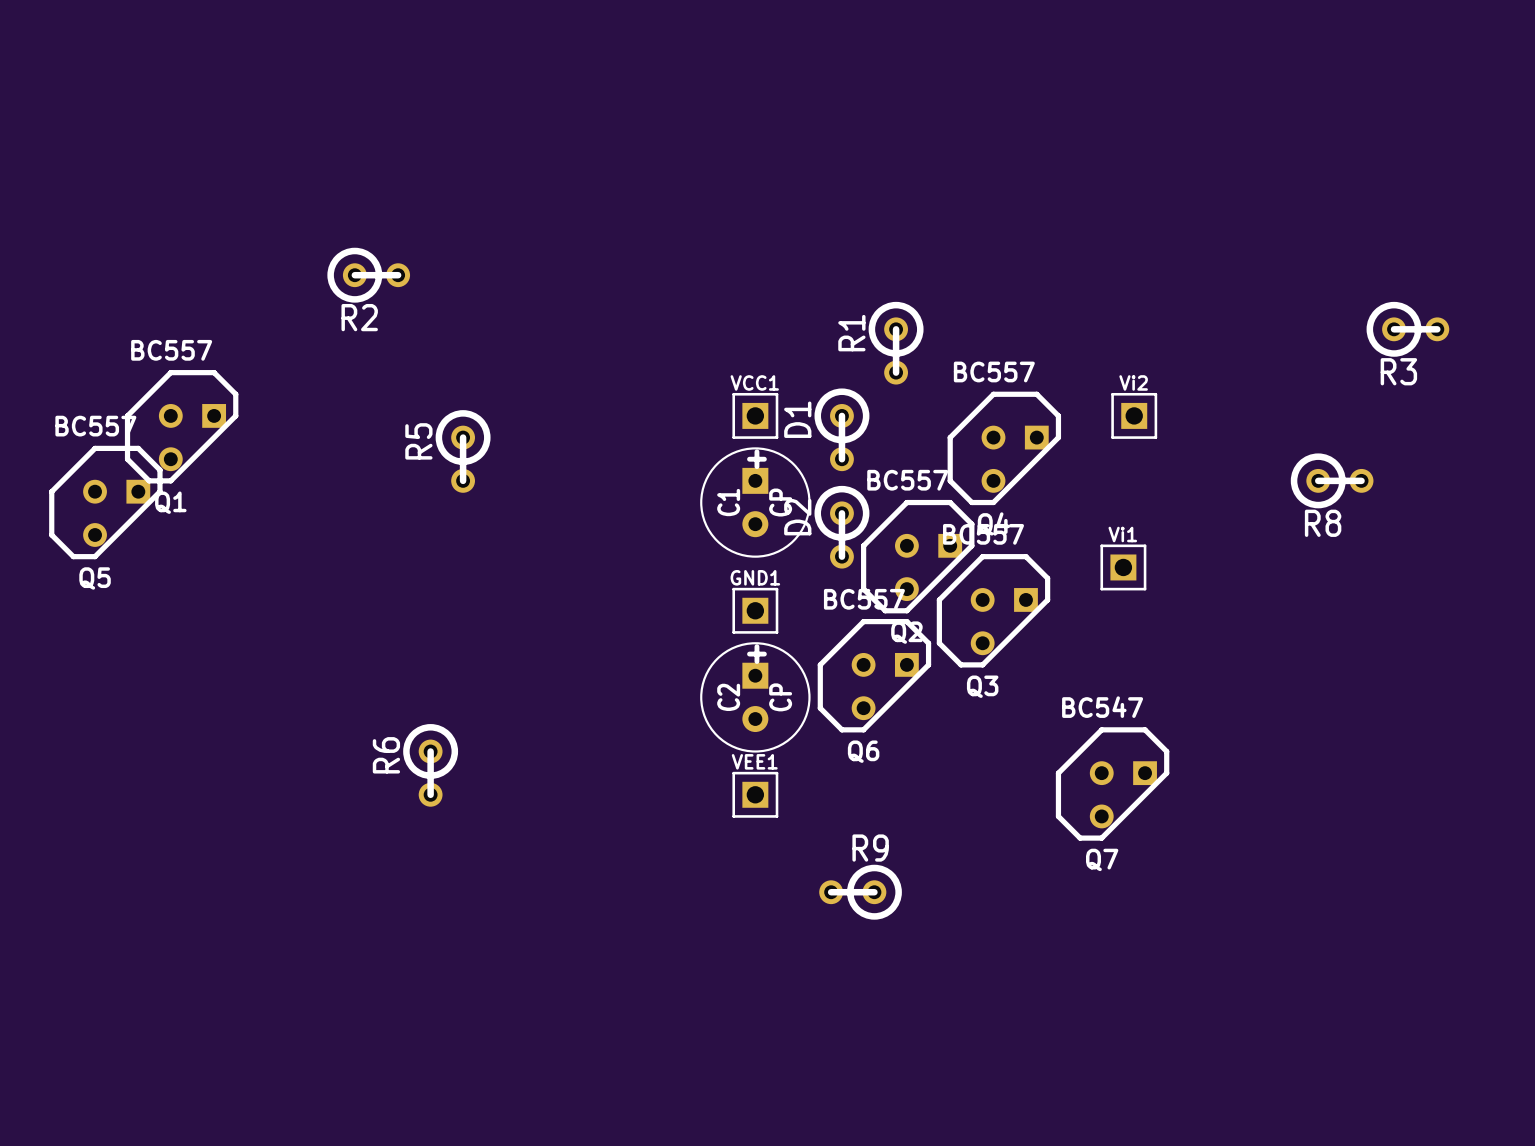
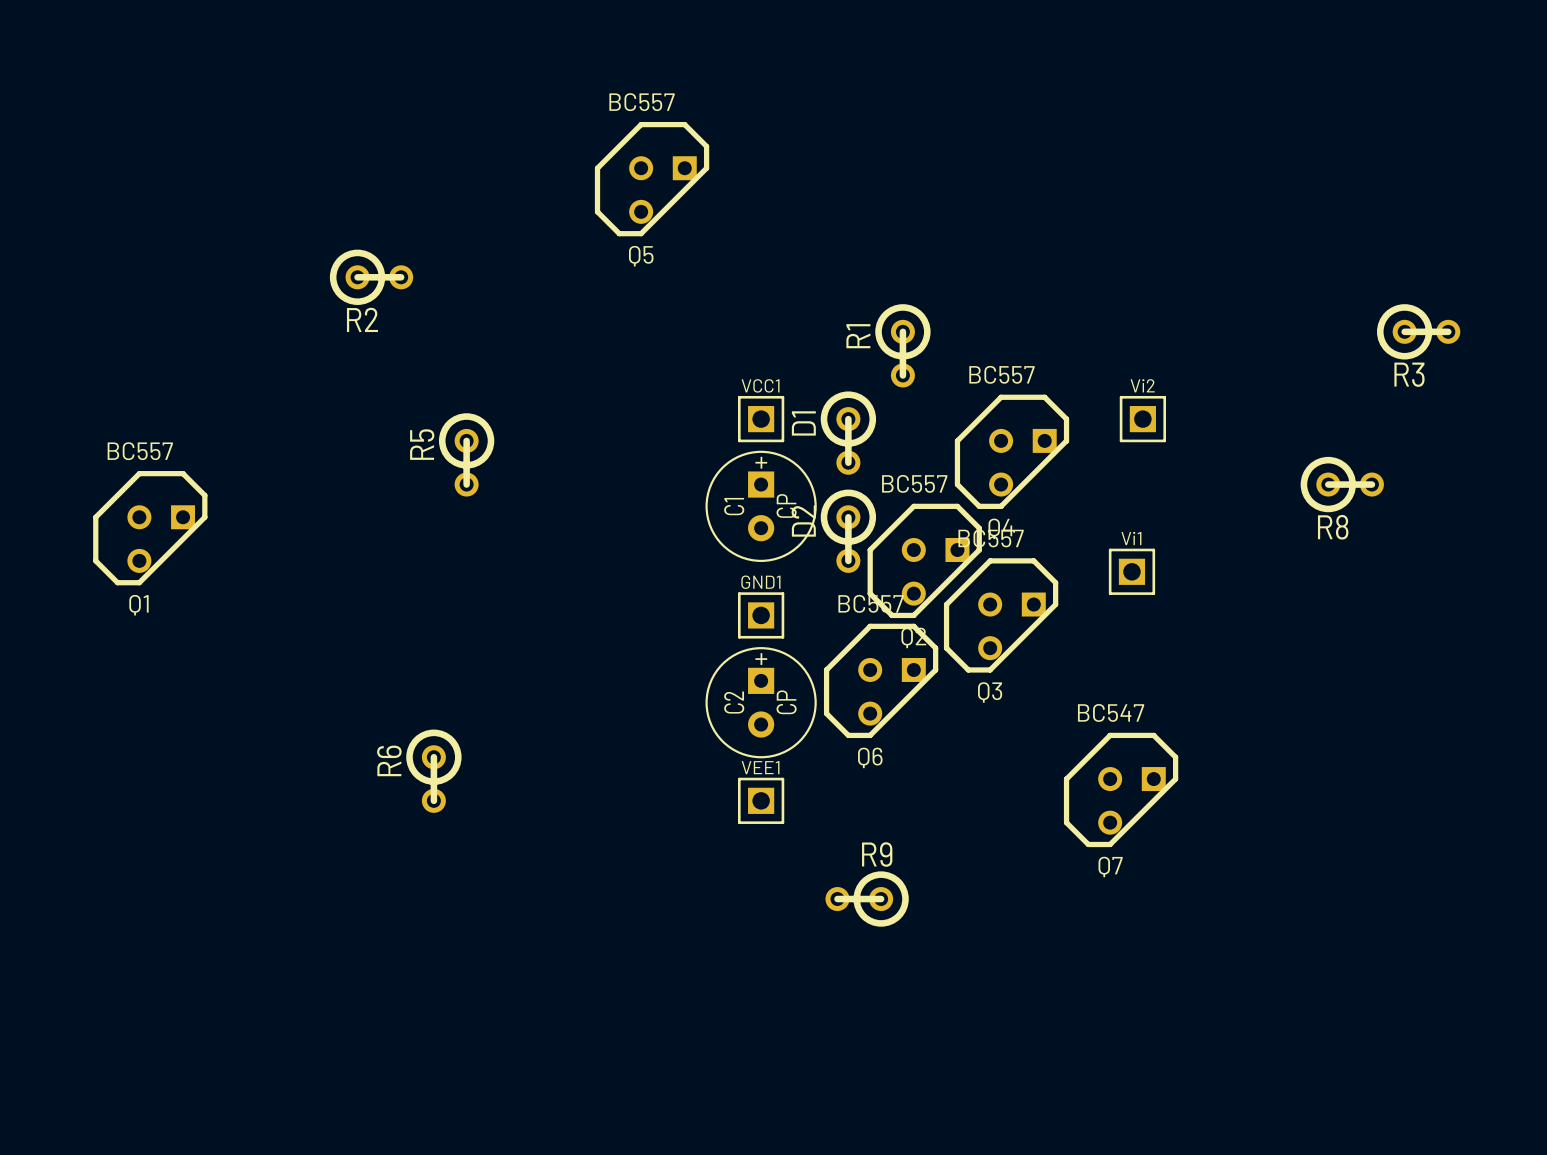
Q1 position: (181, 426) -> (150, 528)
Q5 position: (105, 502) -> (652, 179)

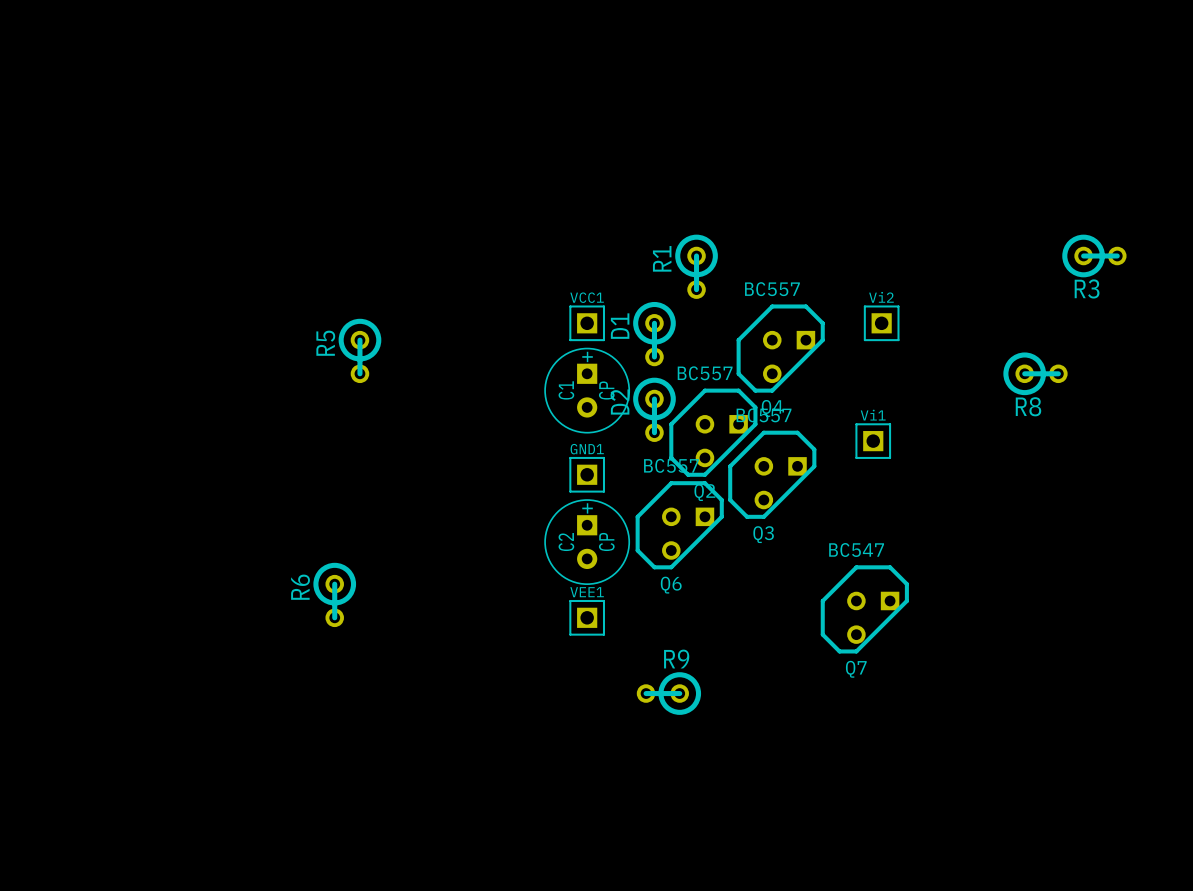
Q5: BC557 (652, 179) -> none
R2: (371, 277) -> none
Q1: BC557 (150, 528) -> none

